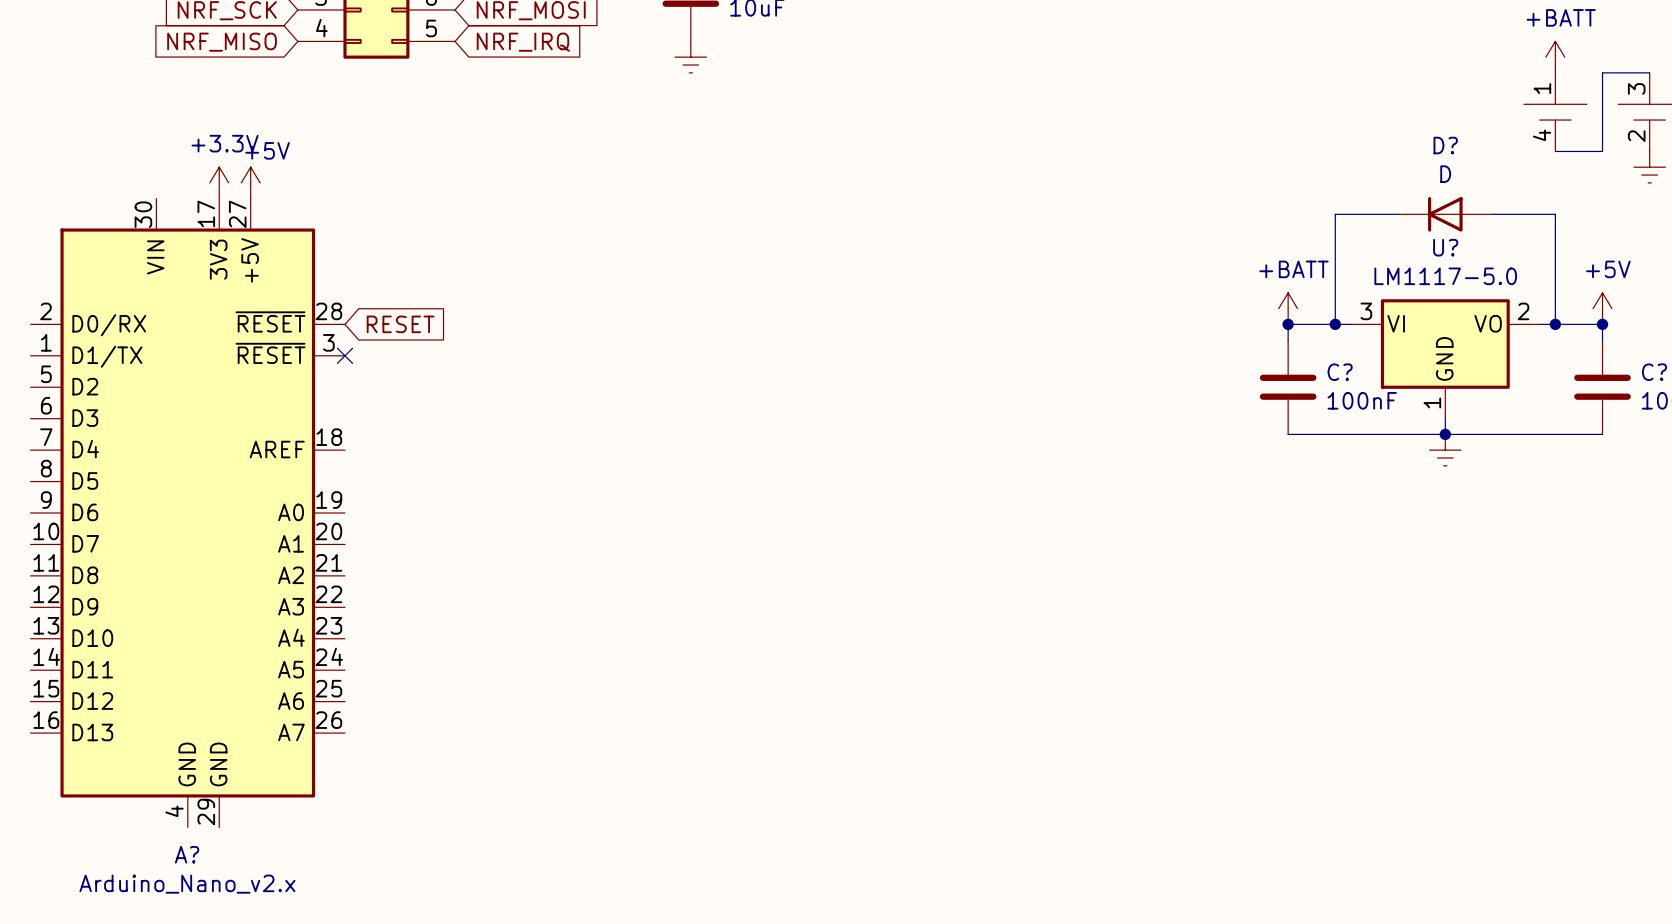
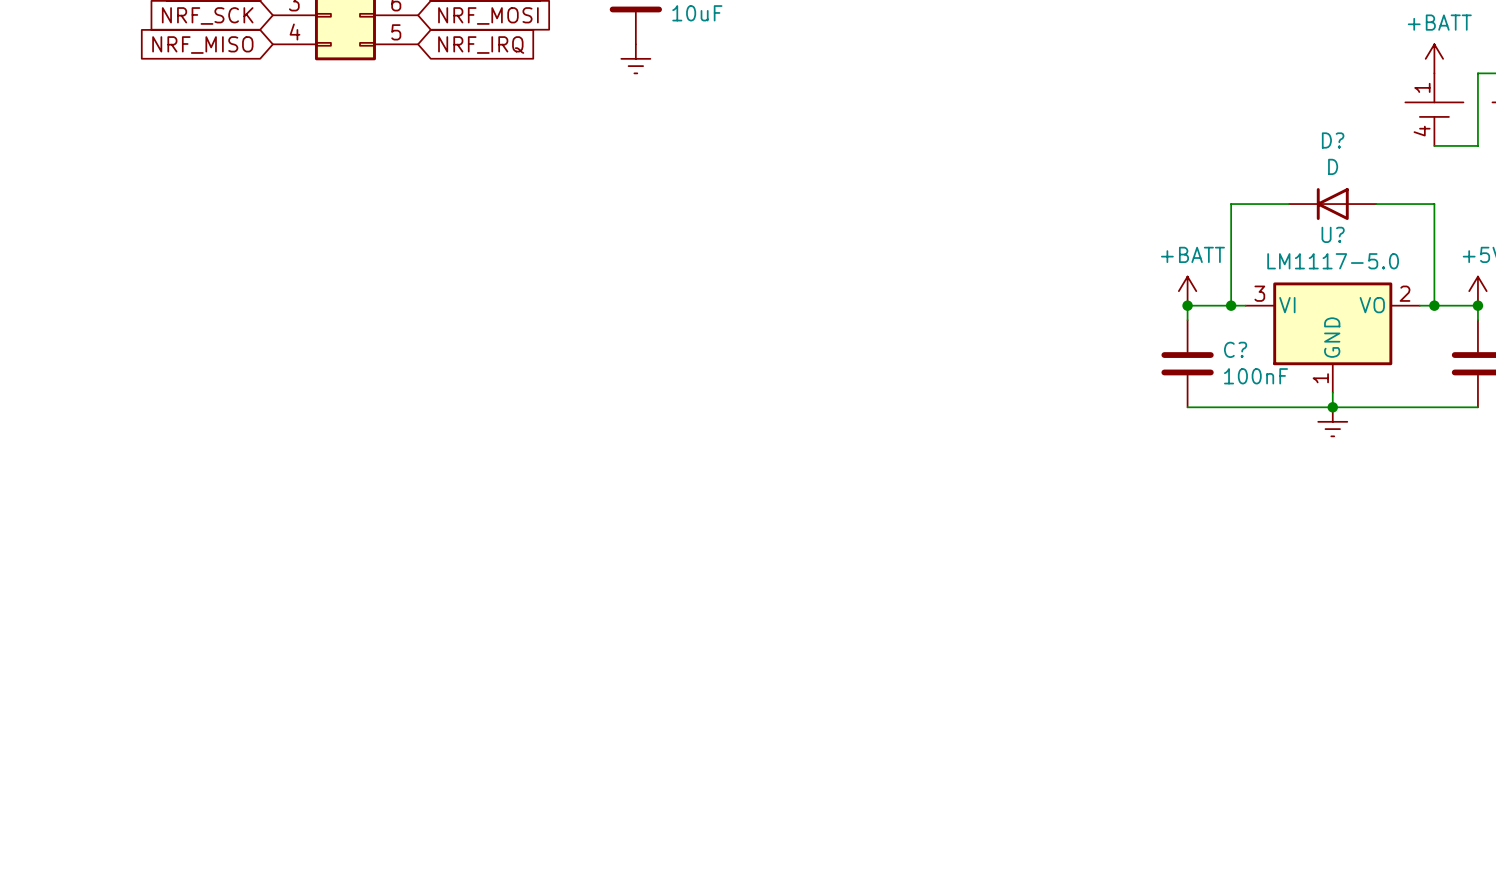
power symbol: +3.3V (219, 182) -> none
power symbol: +5V (250, 182) -> none
global label: RESET (400, 324) -> none
no-connect mark: (345, 355) -> none
A?: Arduino_Nano_v2.x (187, 513) -> none

